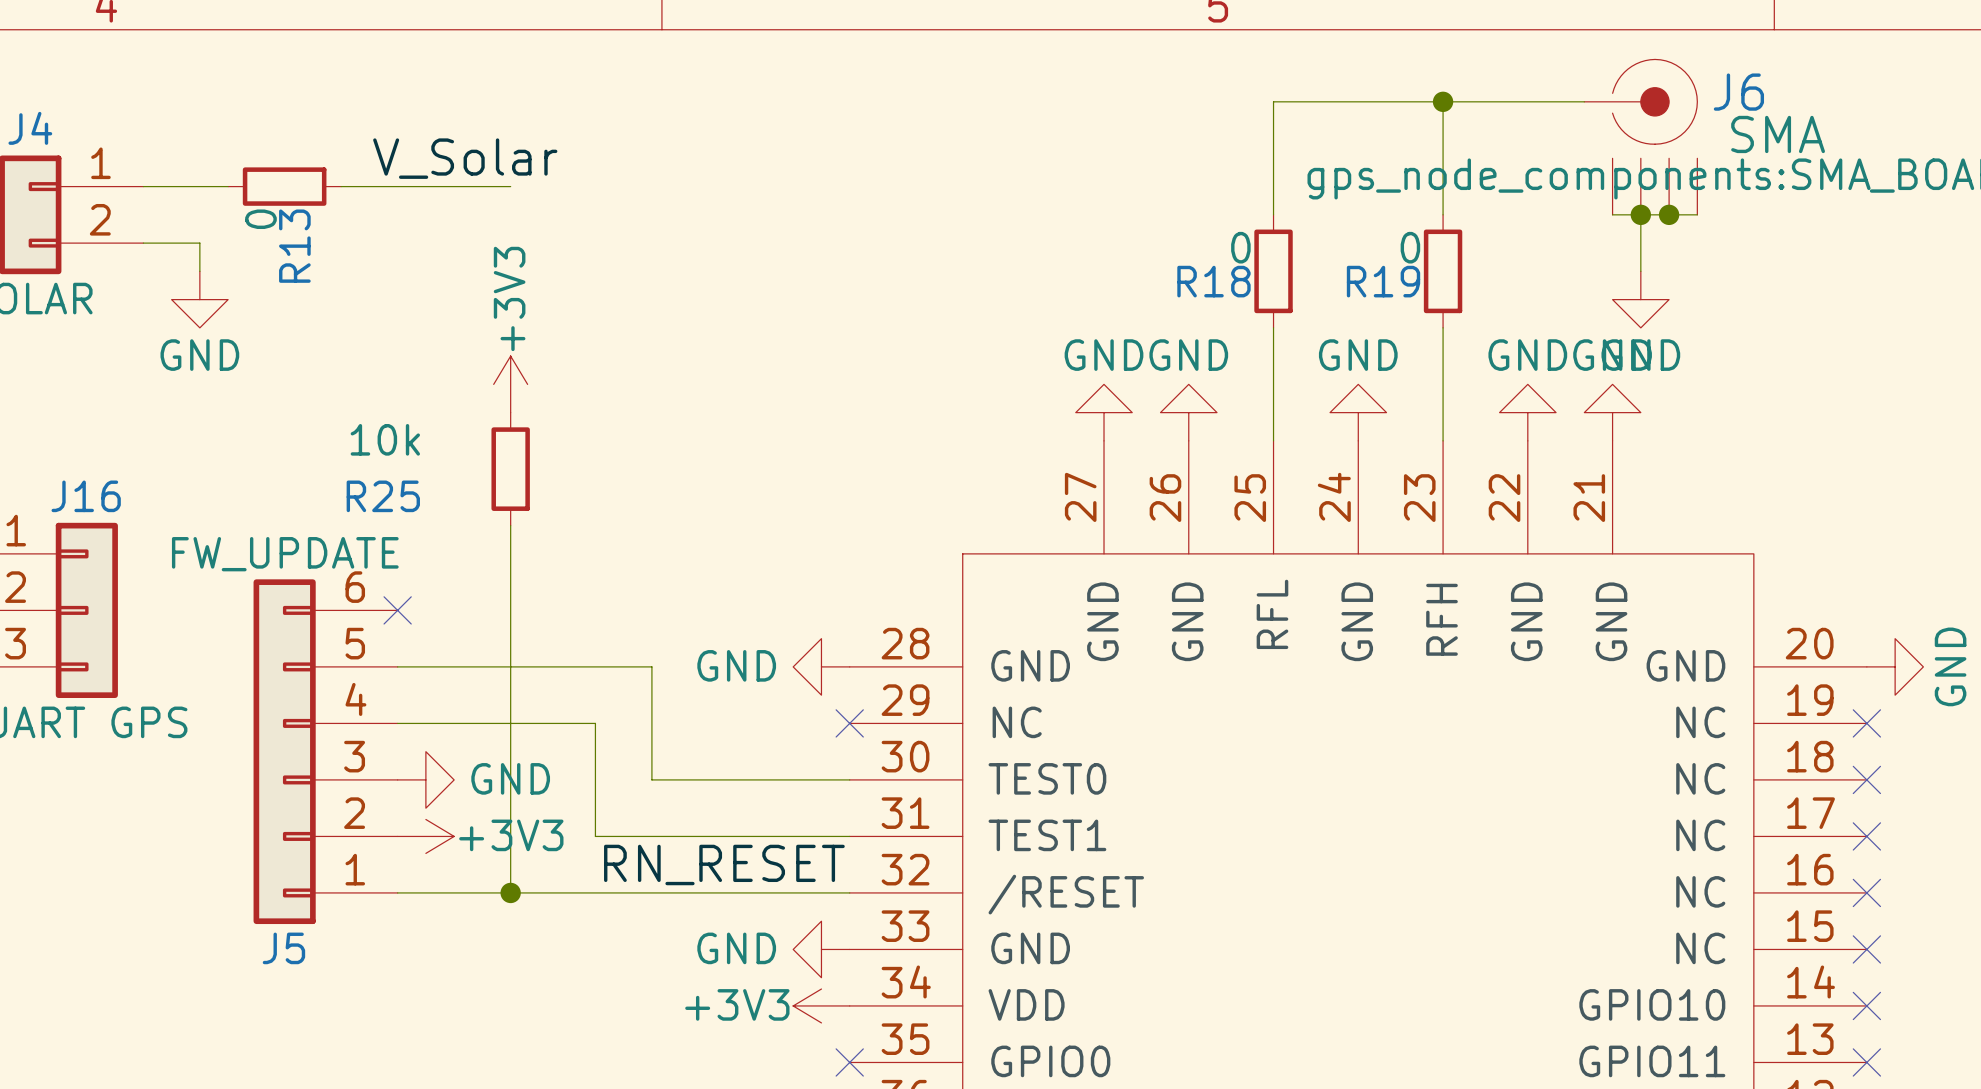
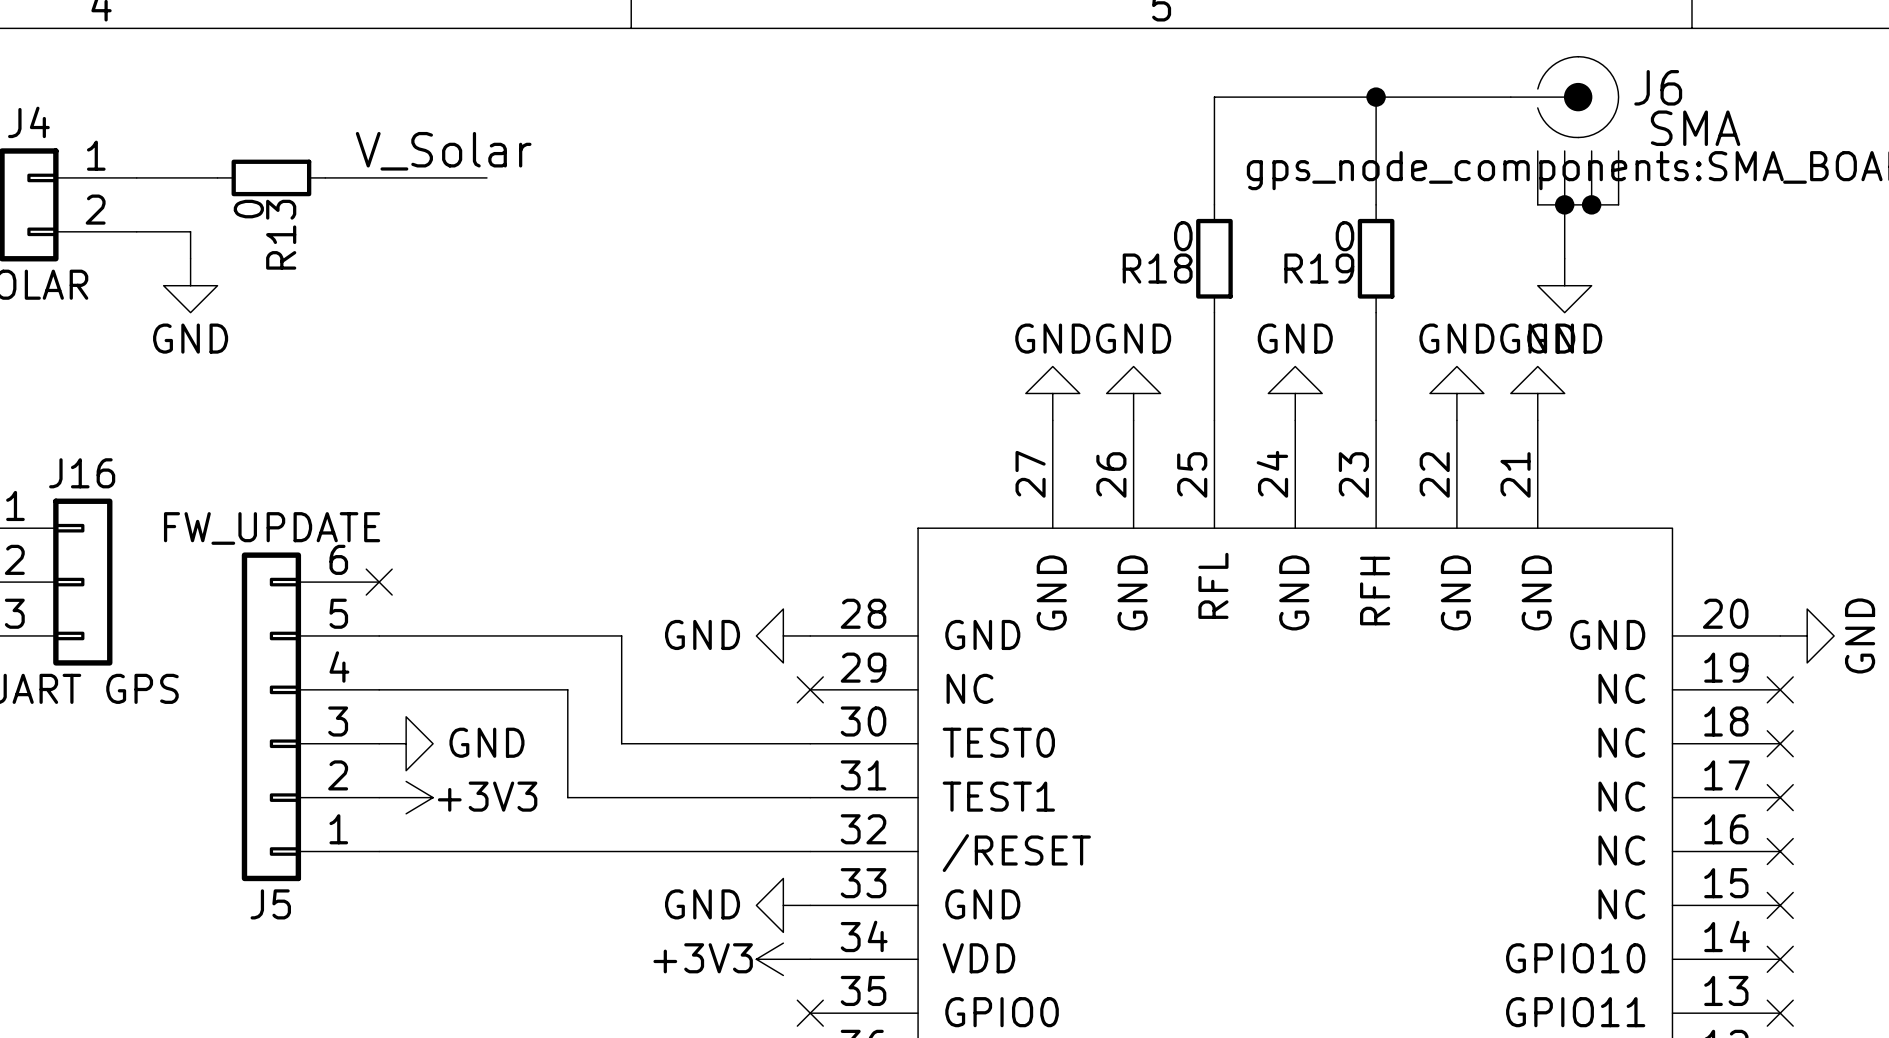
power symbol: +3V3 (510, 384) -> none
R25: 10k (510, 469) -> none
wire: (510, 525) (510, 892) -> none
label: RN_RESET (724, 864) -> none
junction: (510, 892) -> none

